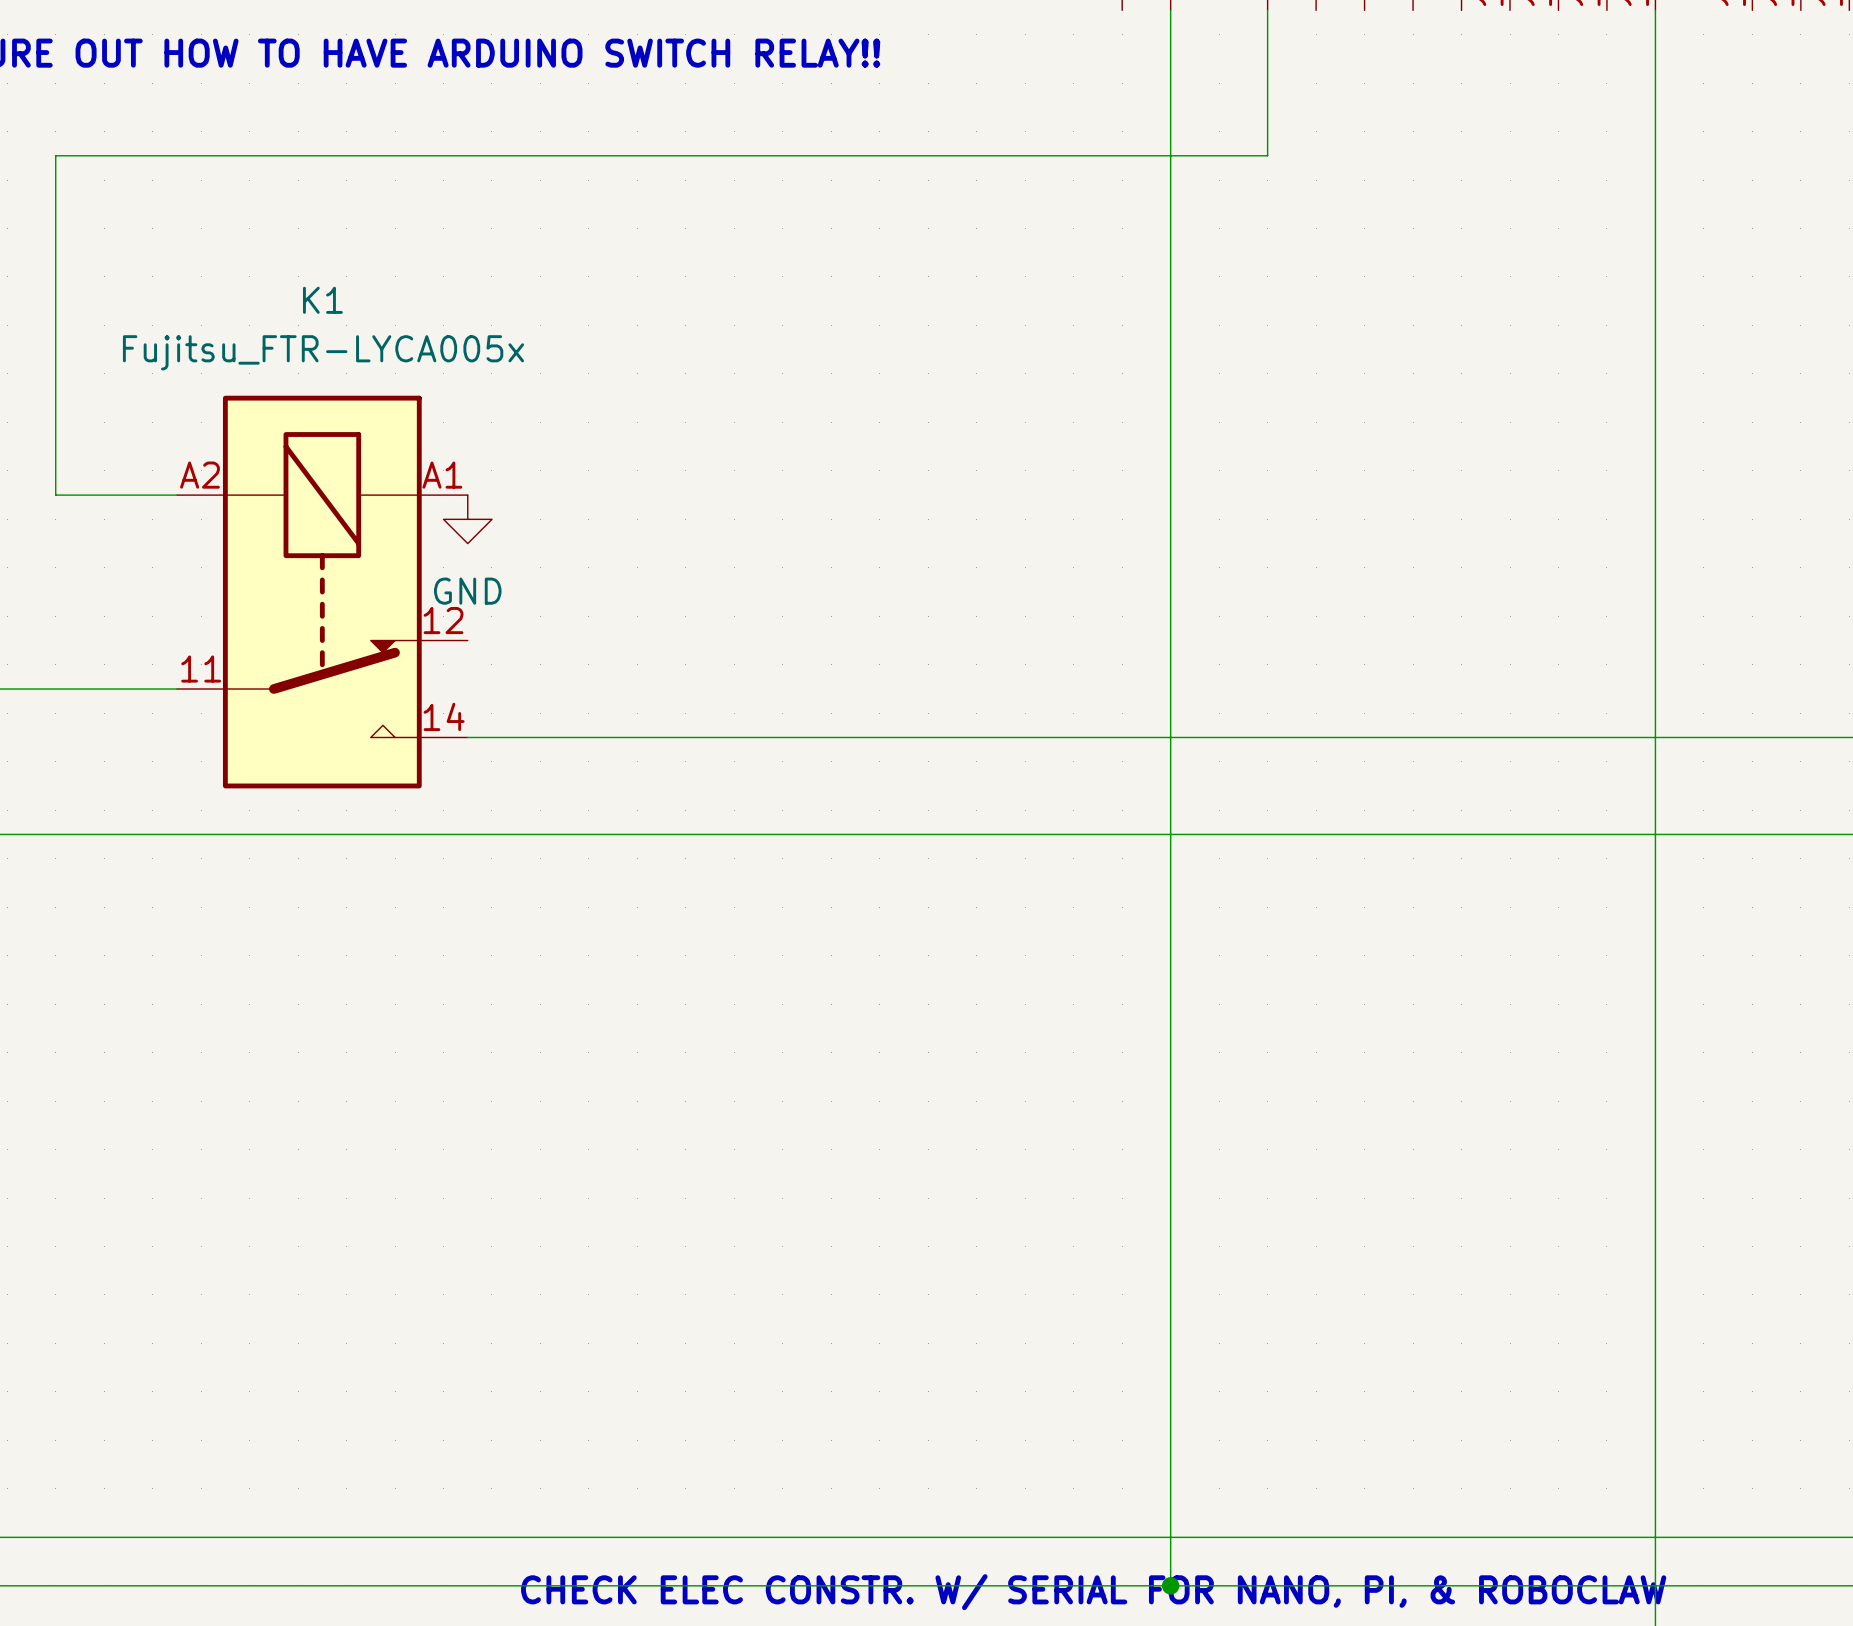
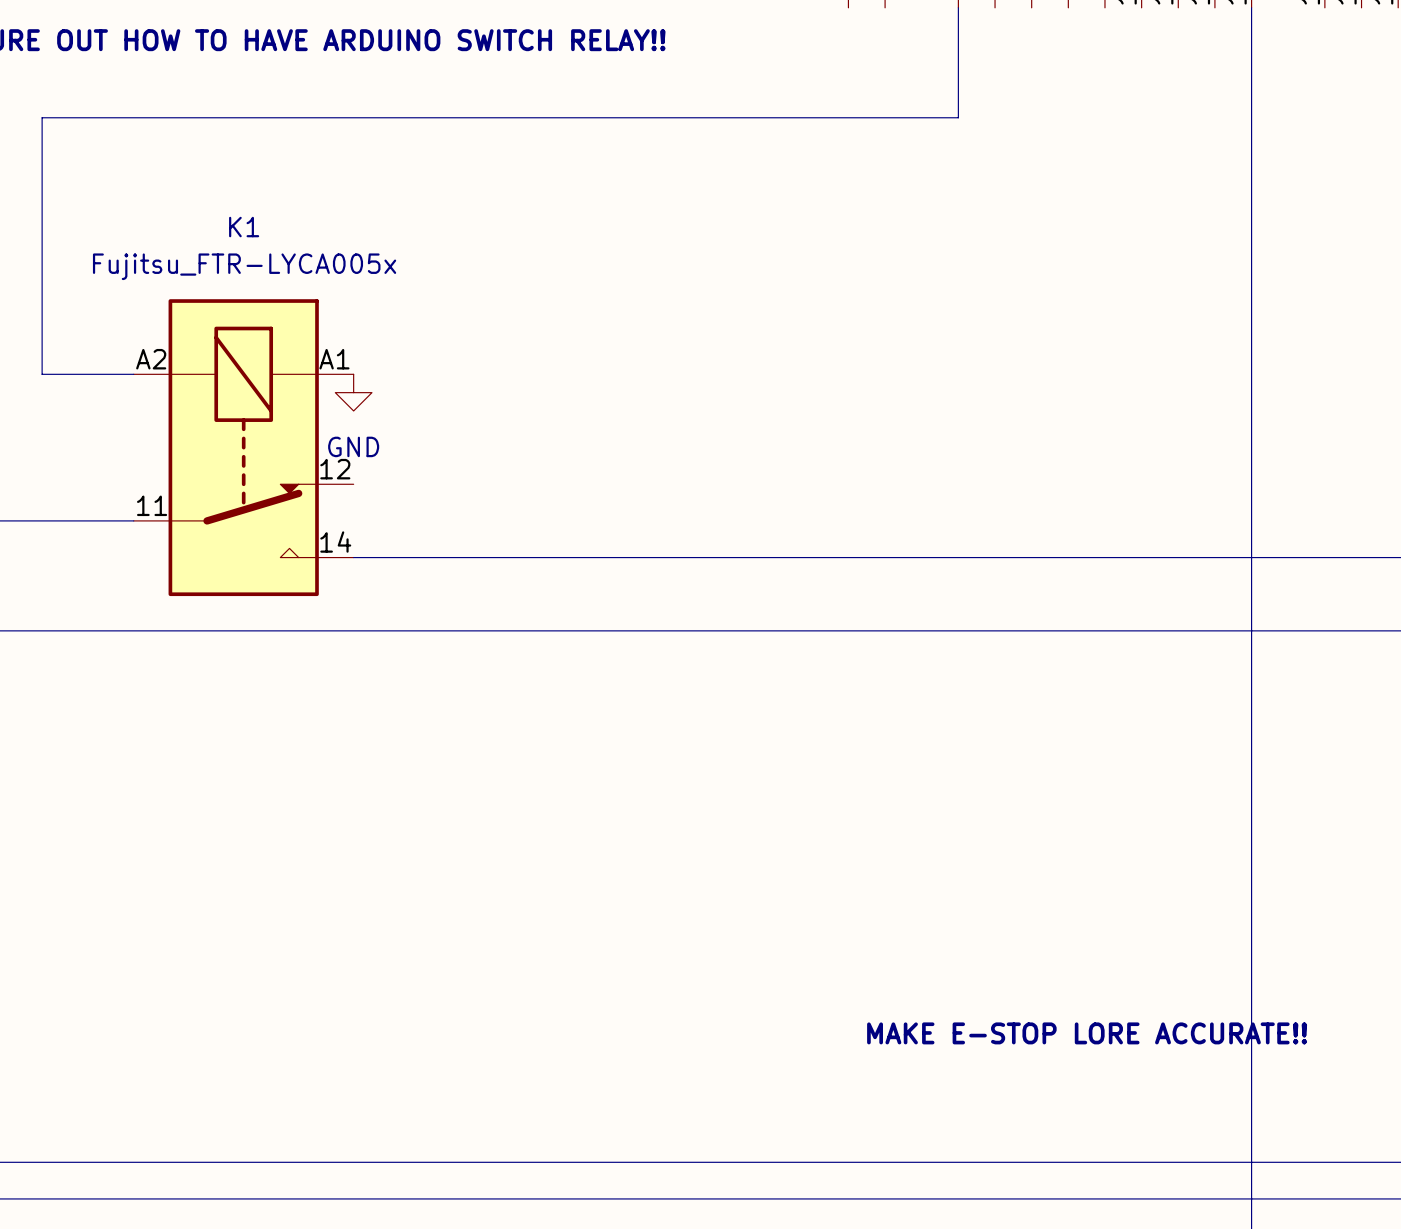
wire: (1170, 10) (1170, 1585) -> none
text: none -> MAKE E-STOP LORE ACCURATE!! (1087, 1033)
junction: (1170, 1585) -> none
text: CHECK ELEC CONSTR. W/ SERIAL FOR NANO, PI, & ROBOCLAW (1093, 1592) -> none

